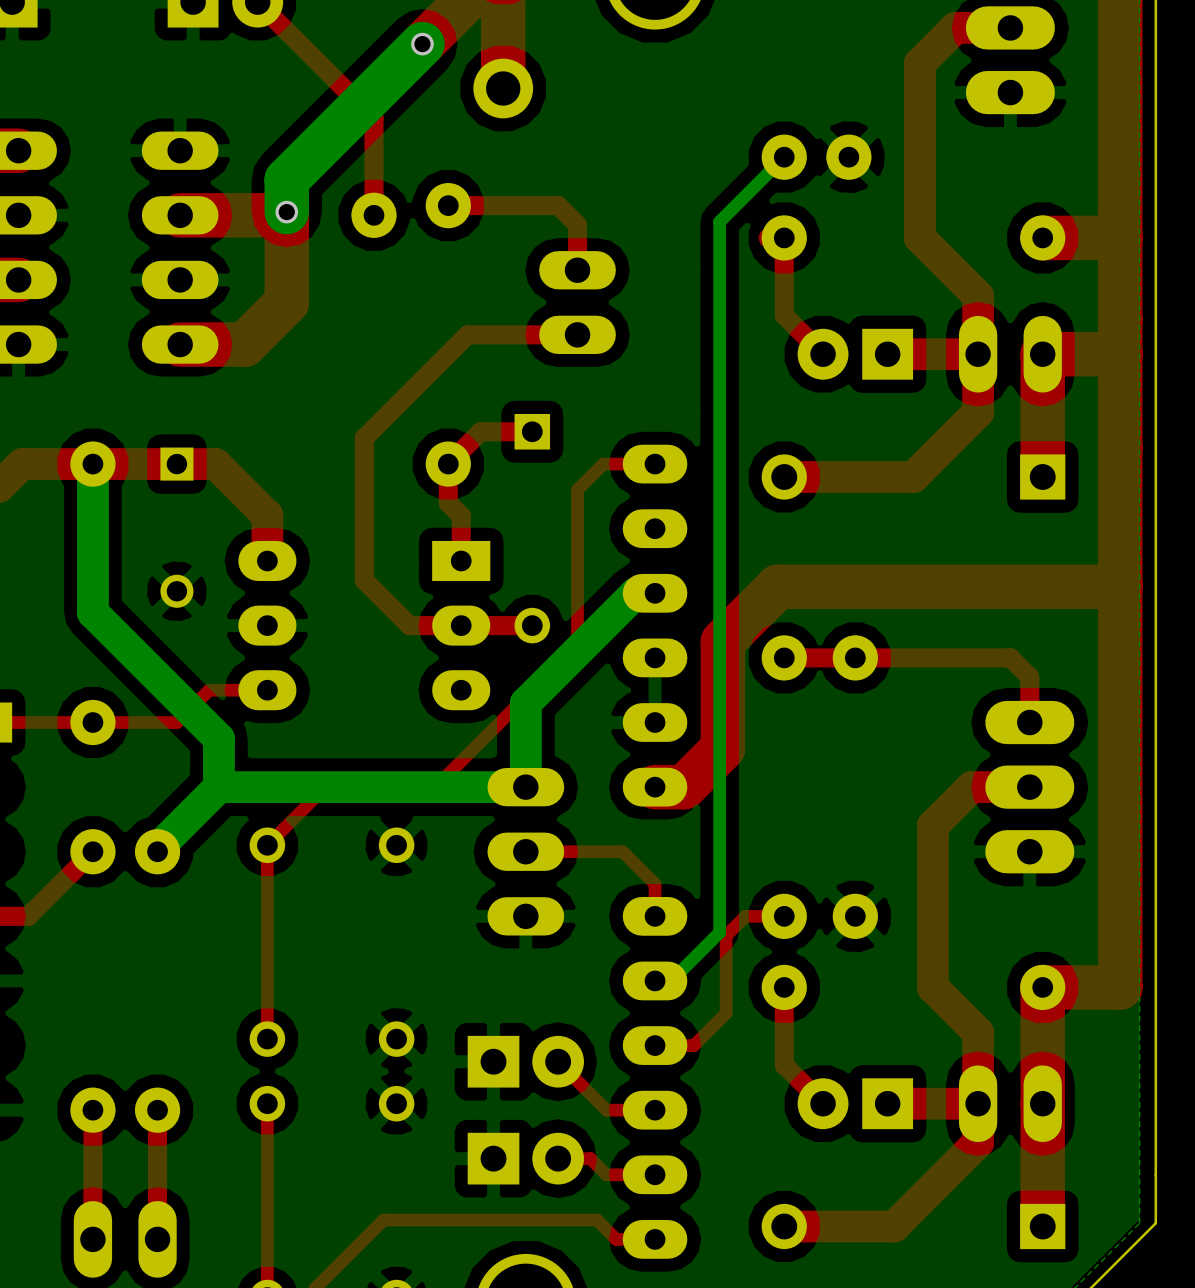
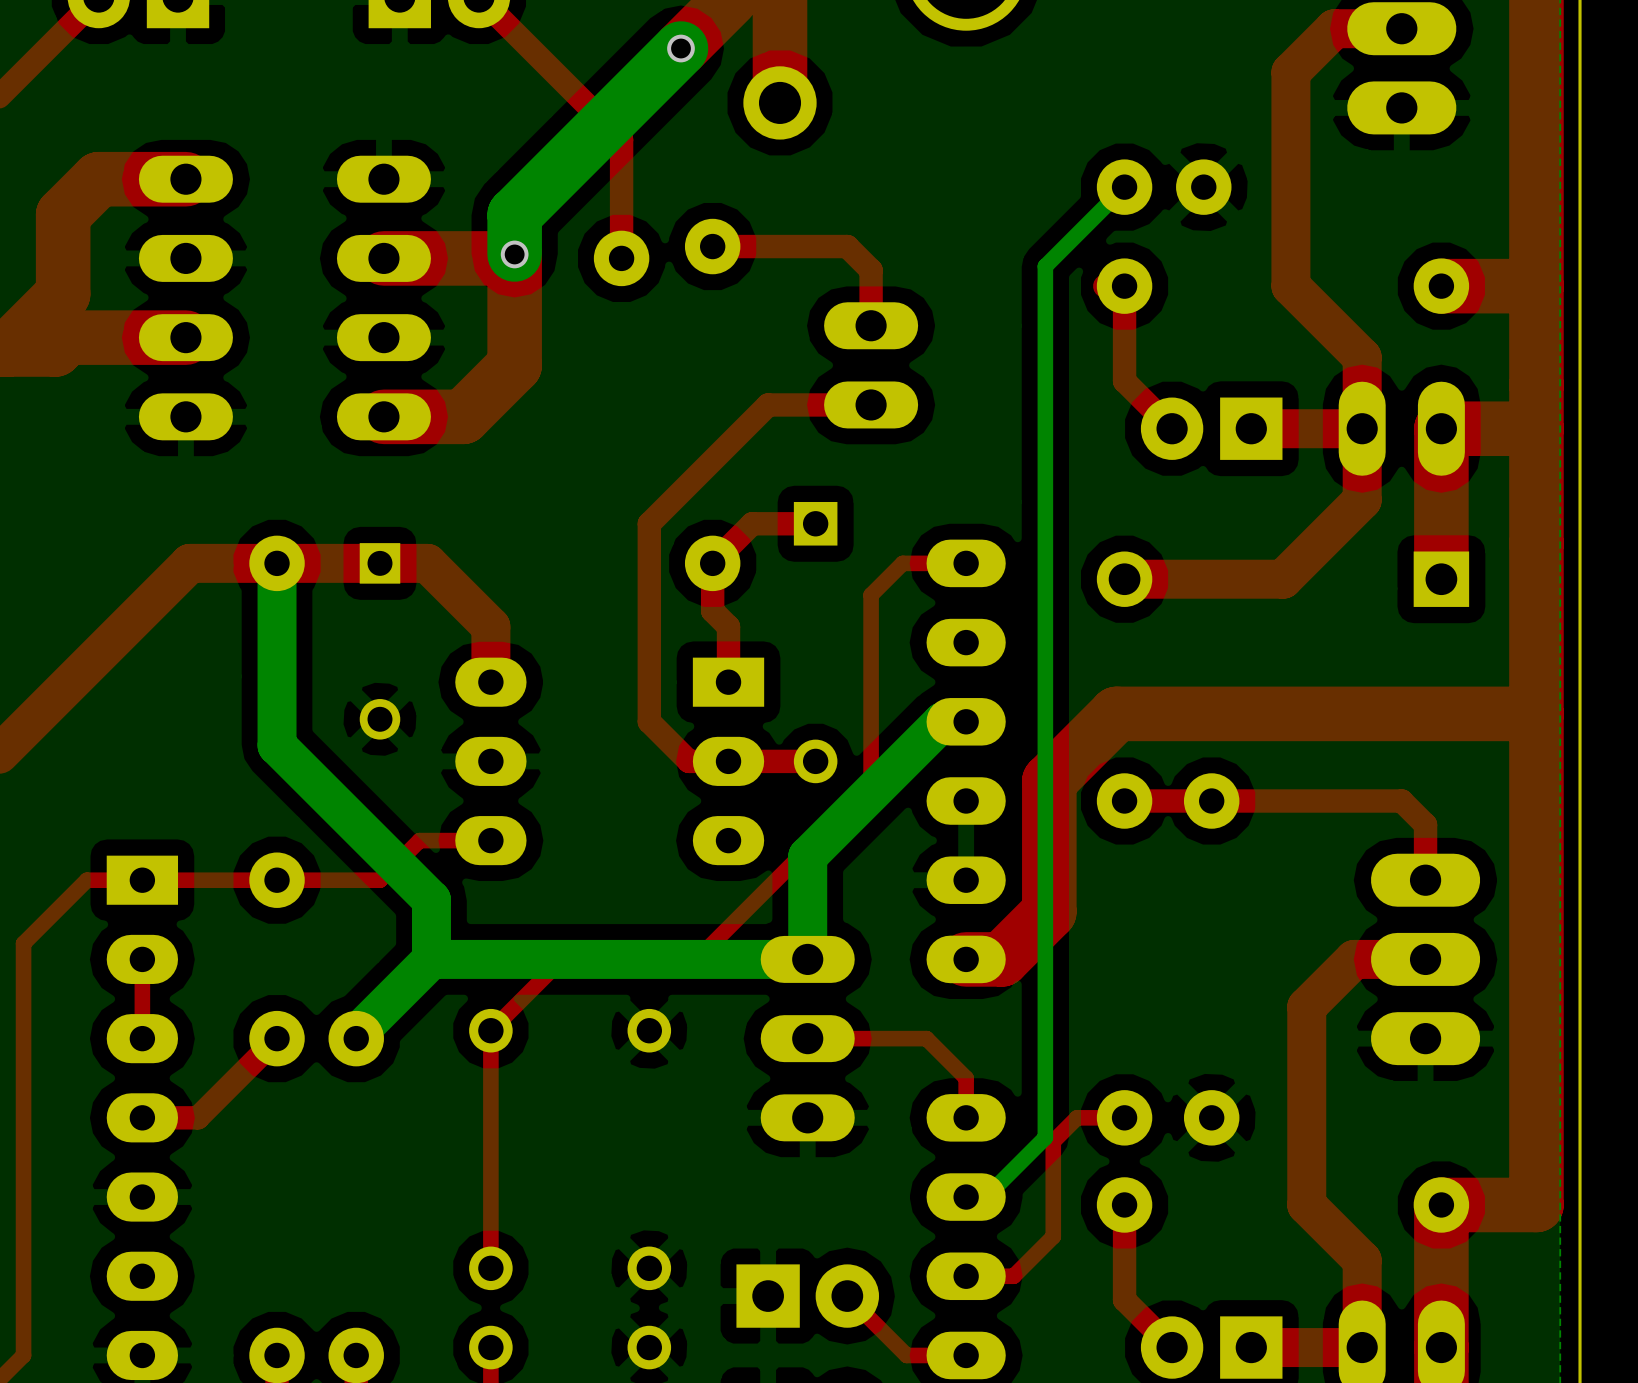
top track: (493, 334) (467, 334) (364, 438) (364, 580) (409, 625) (428, 625) -> (768, 404) (649, 523) (649, 721) (688, 761)

